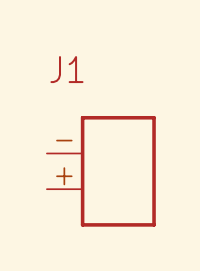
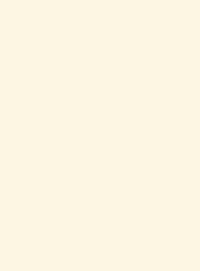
J1: (101, 171) -> none

